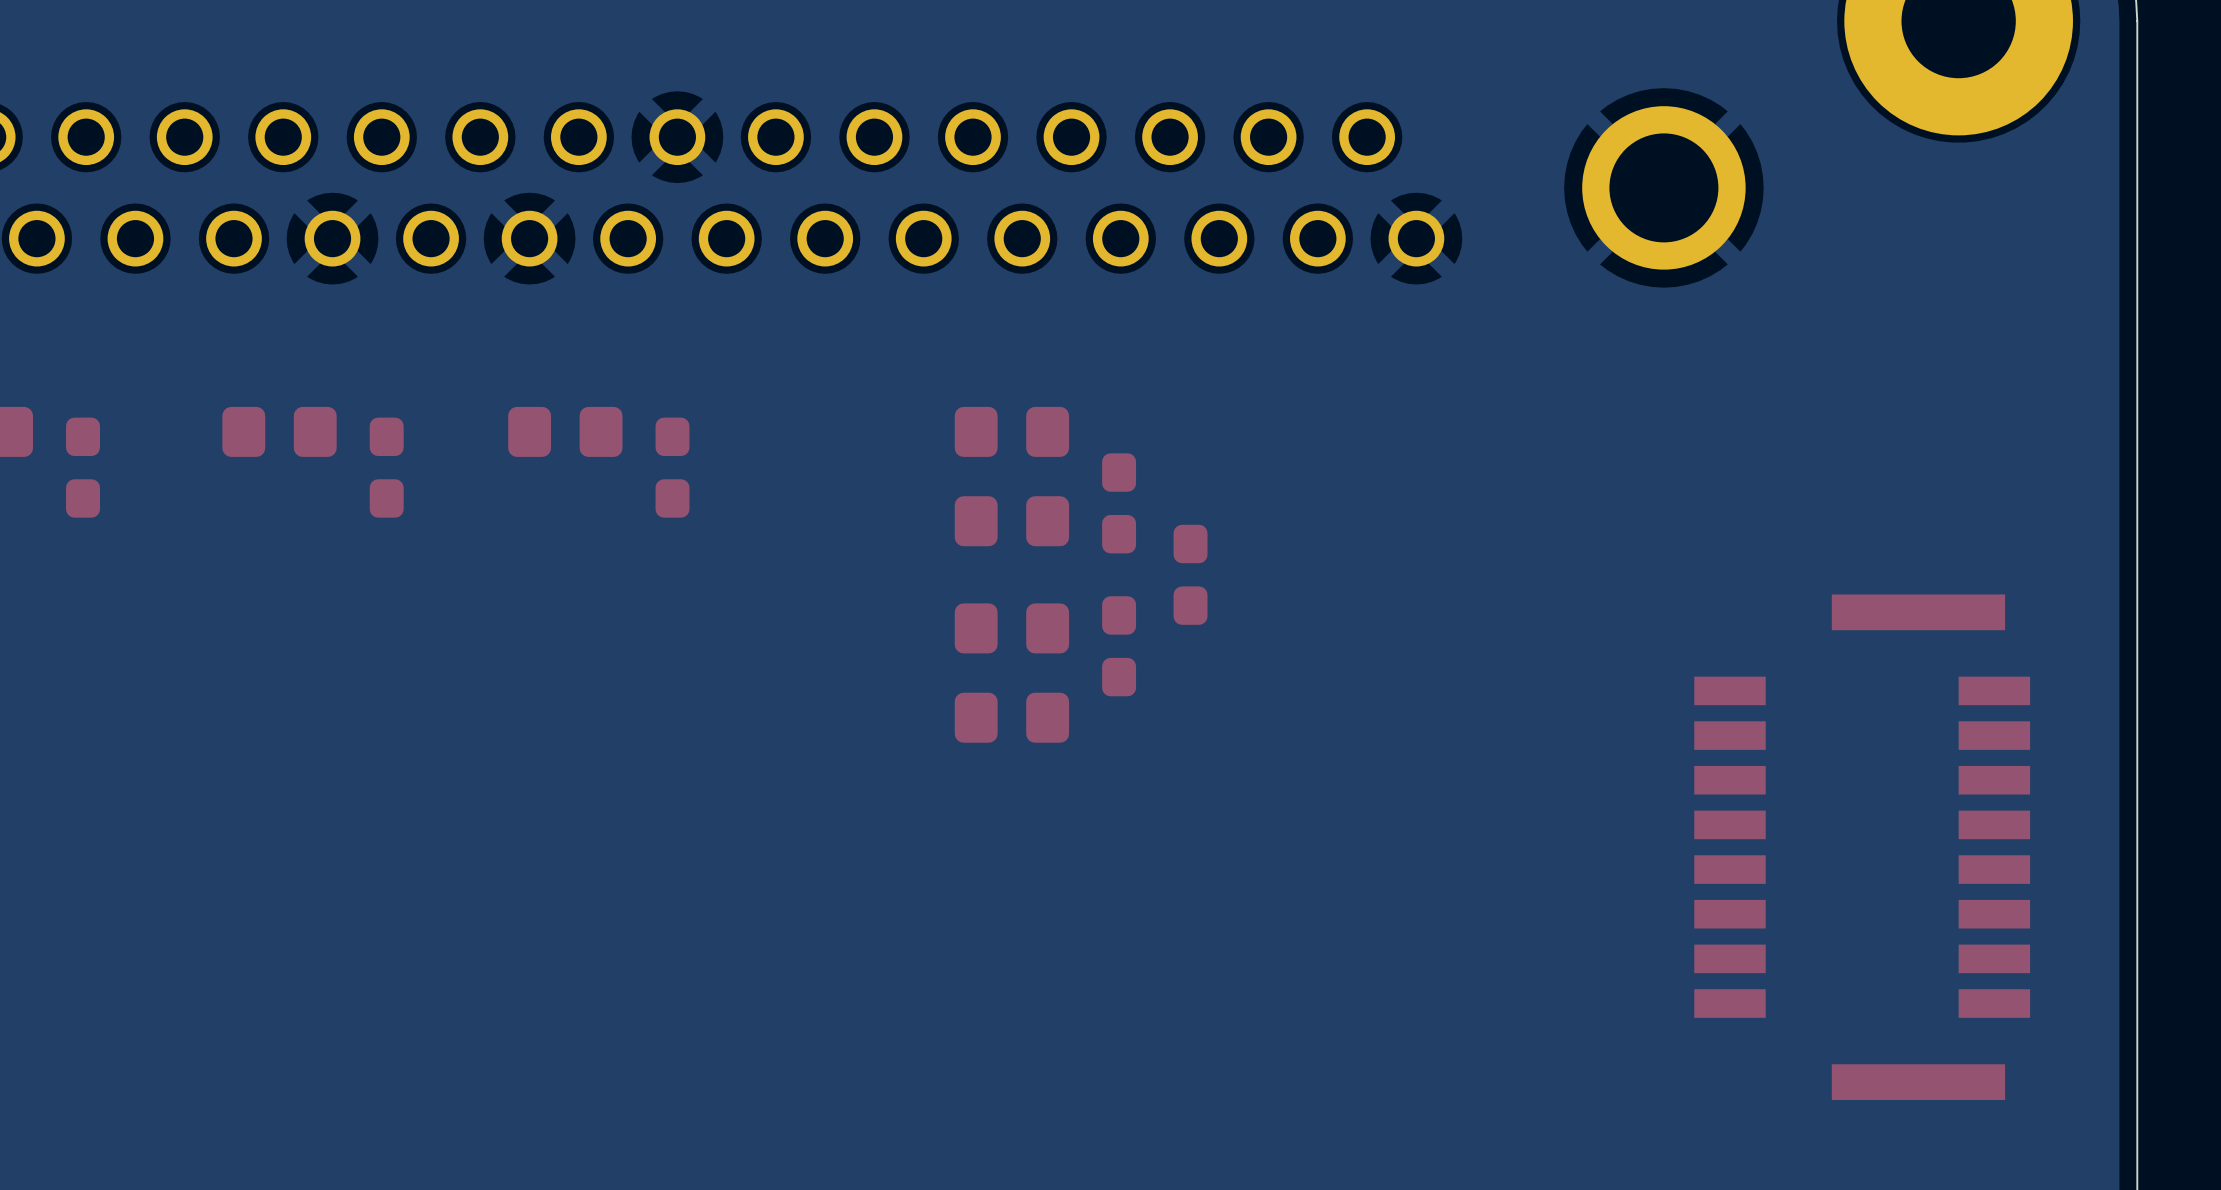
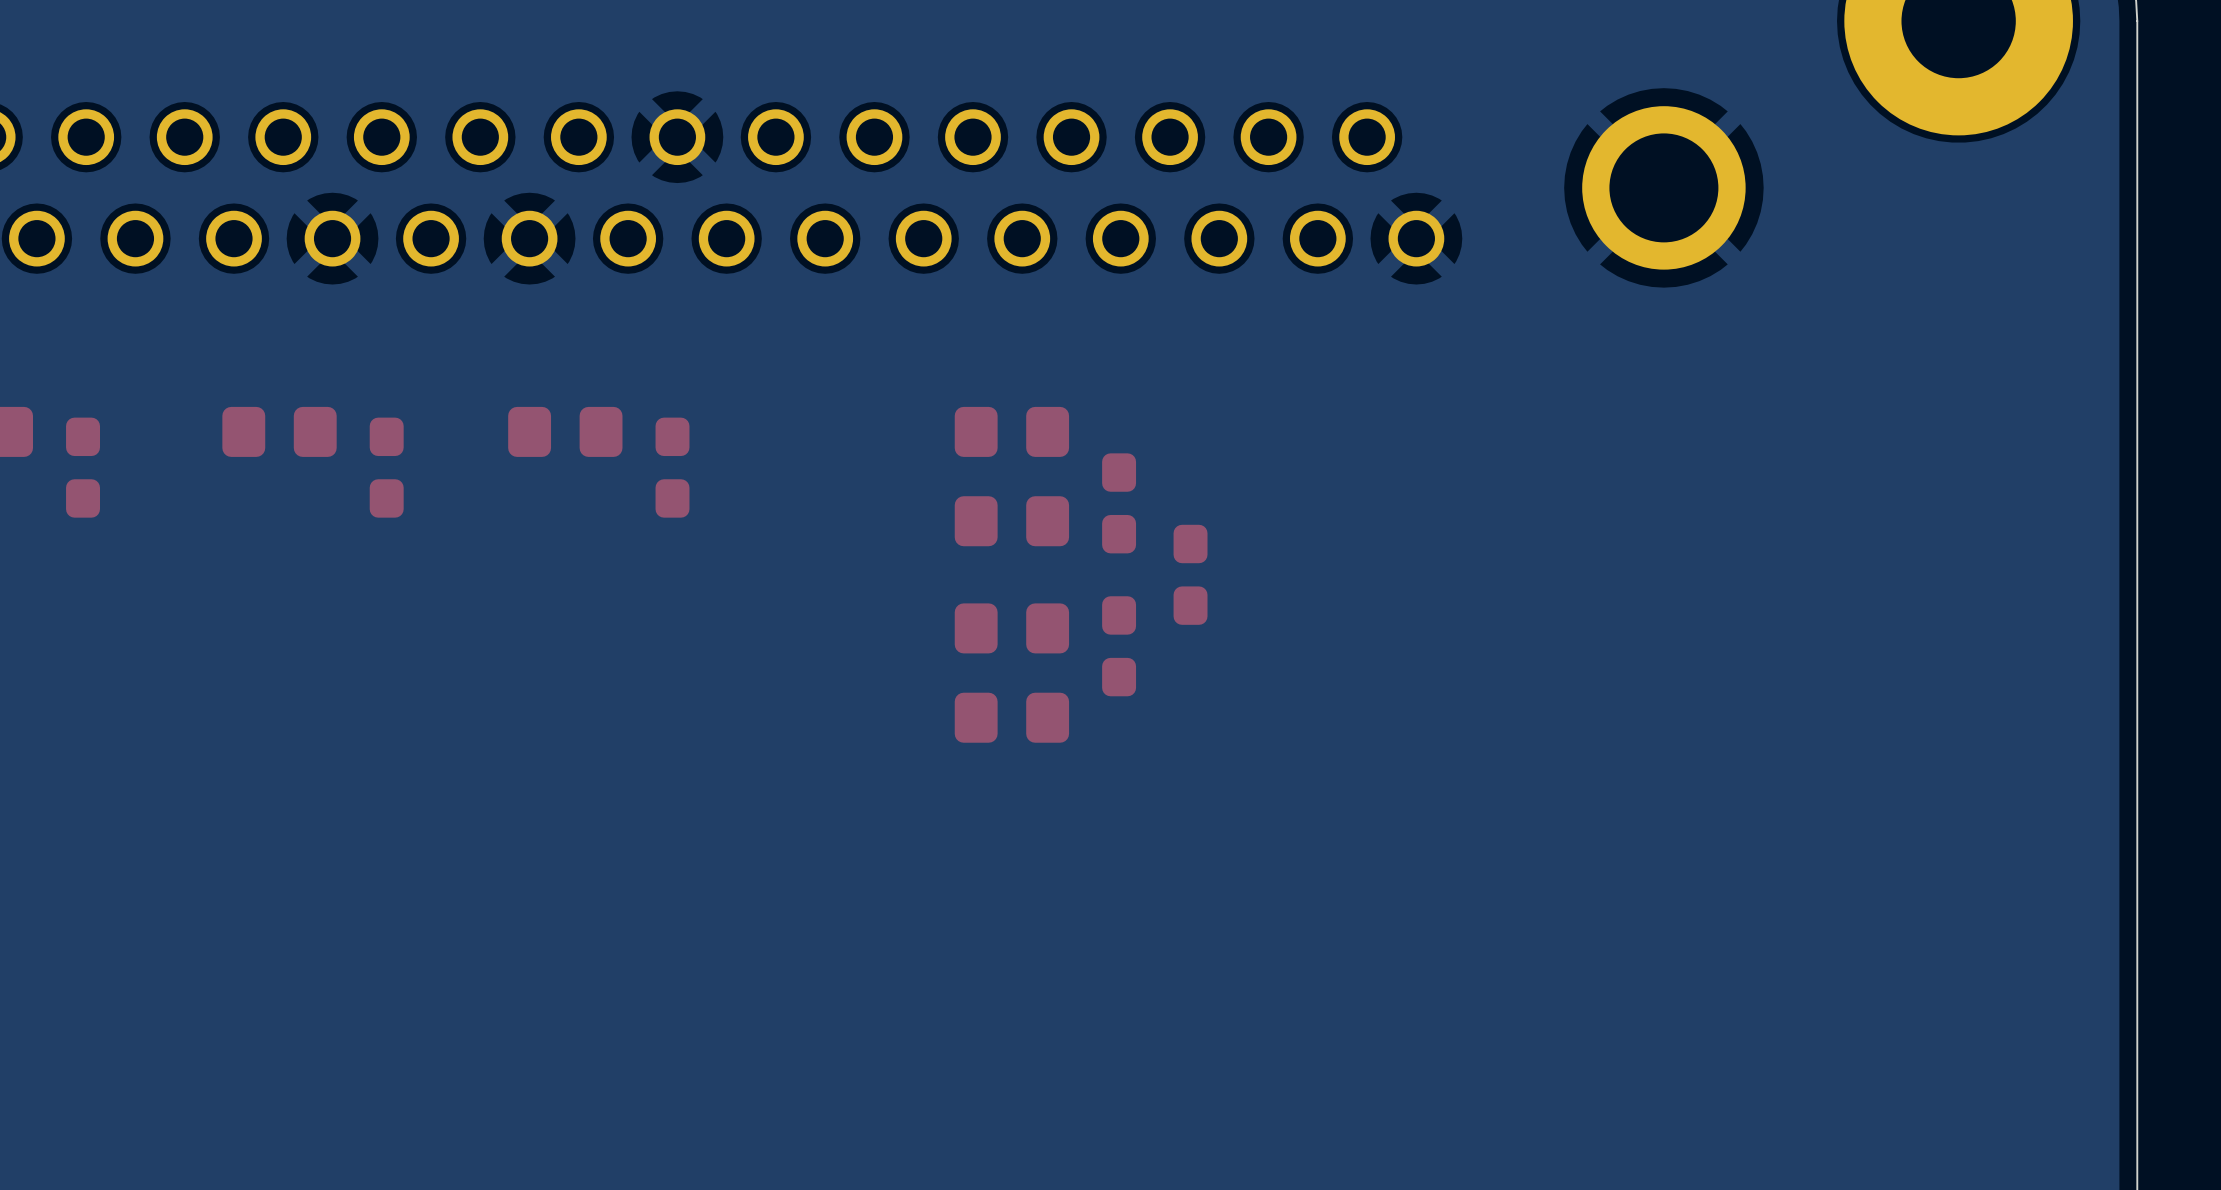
part: (1862, 847) -> none

